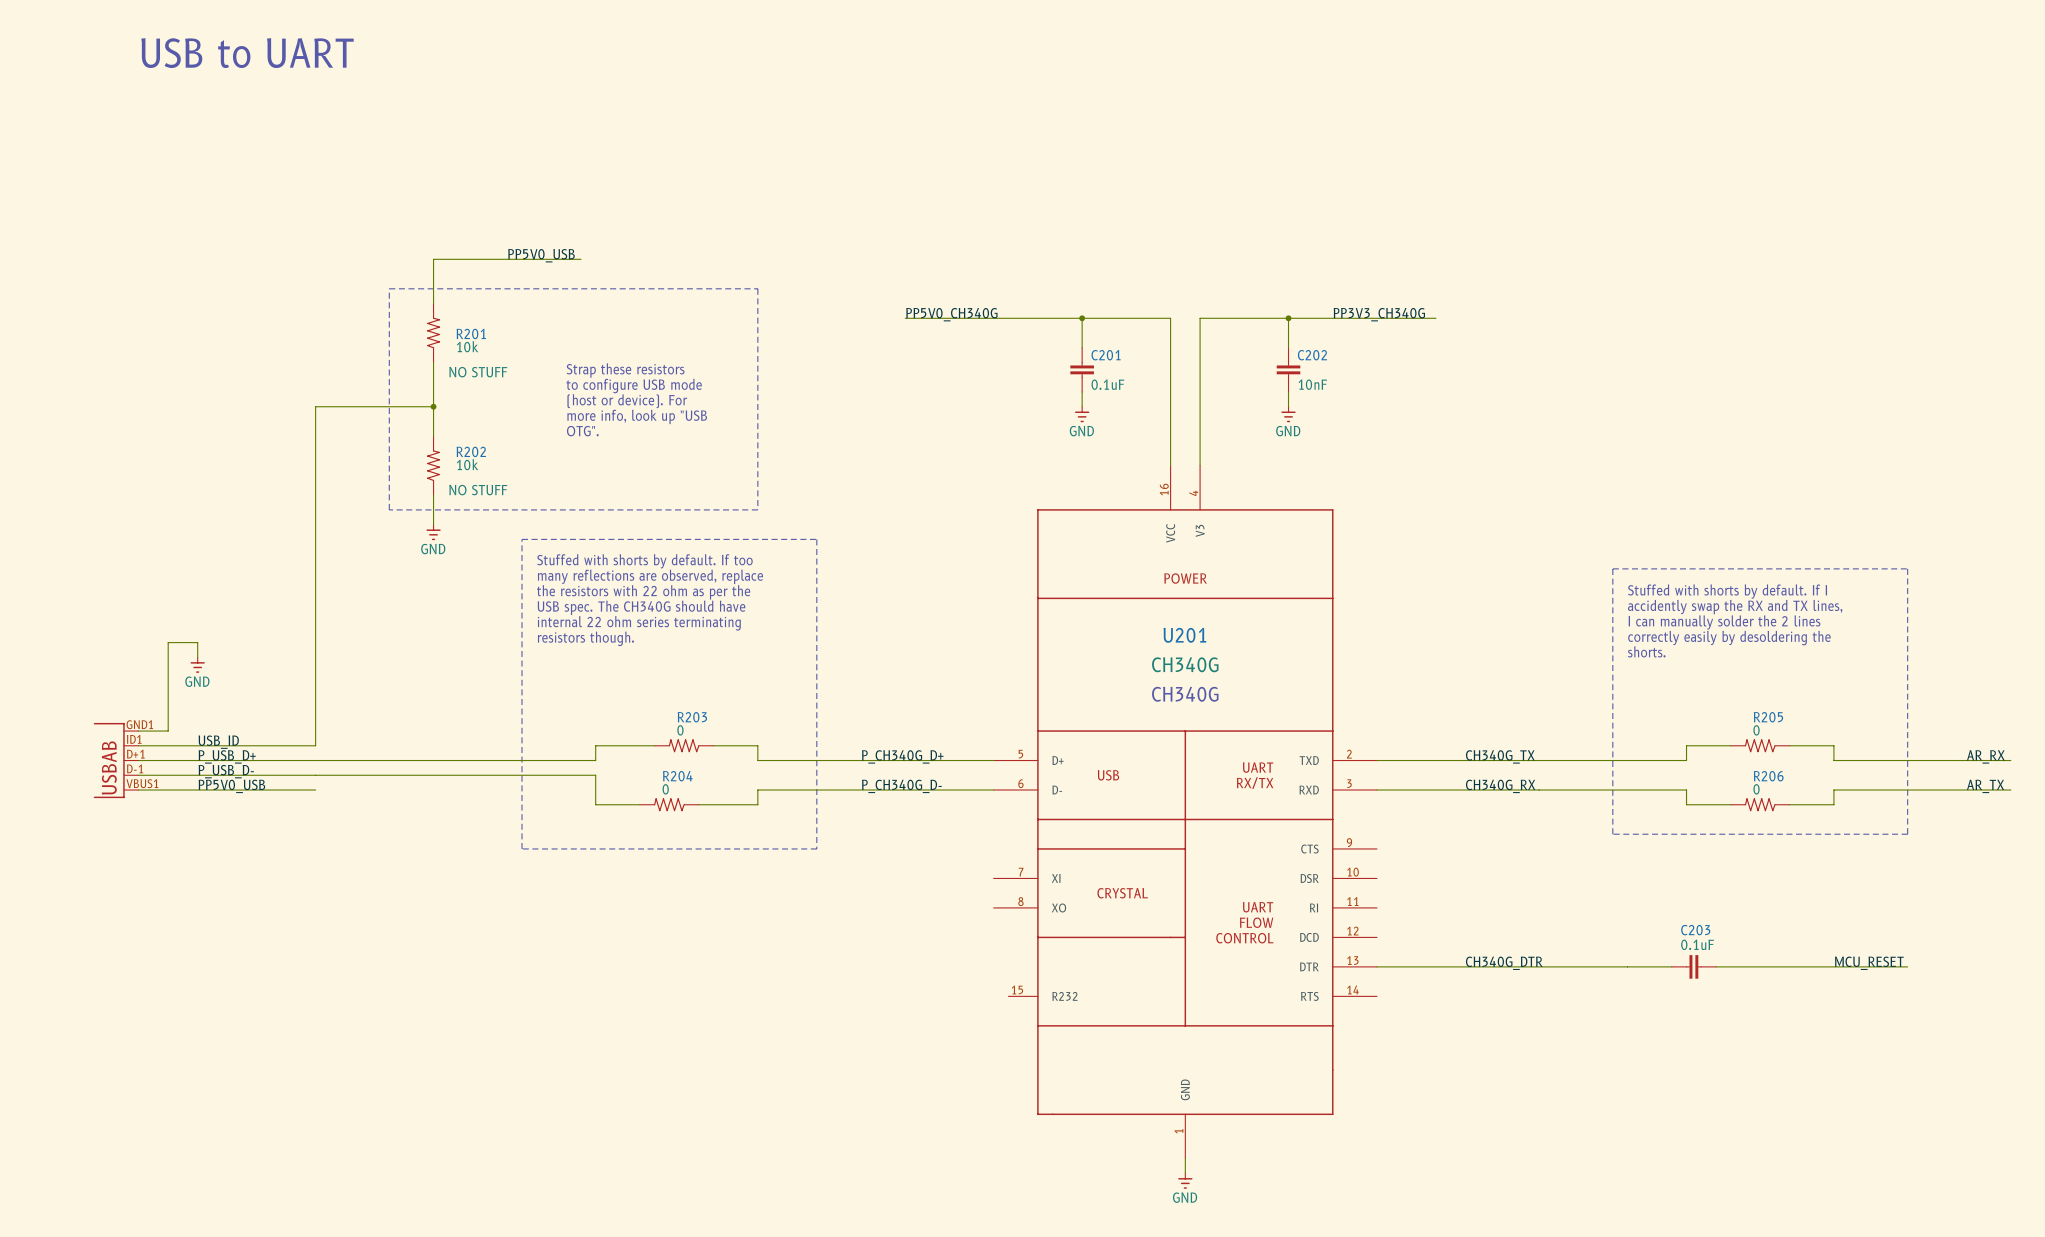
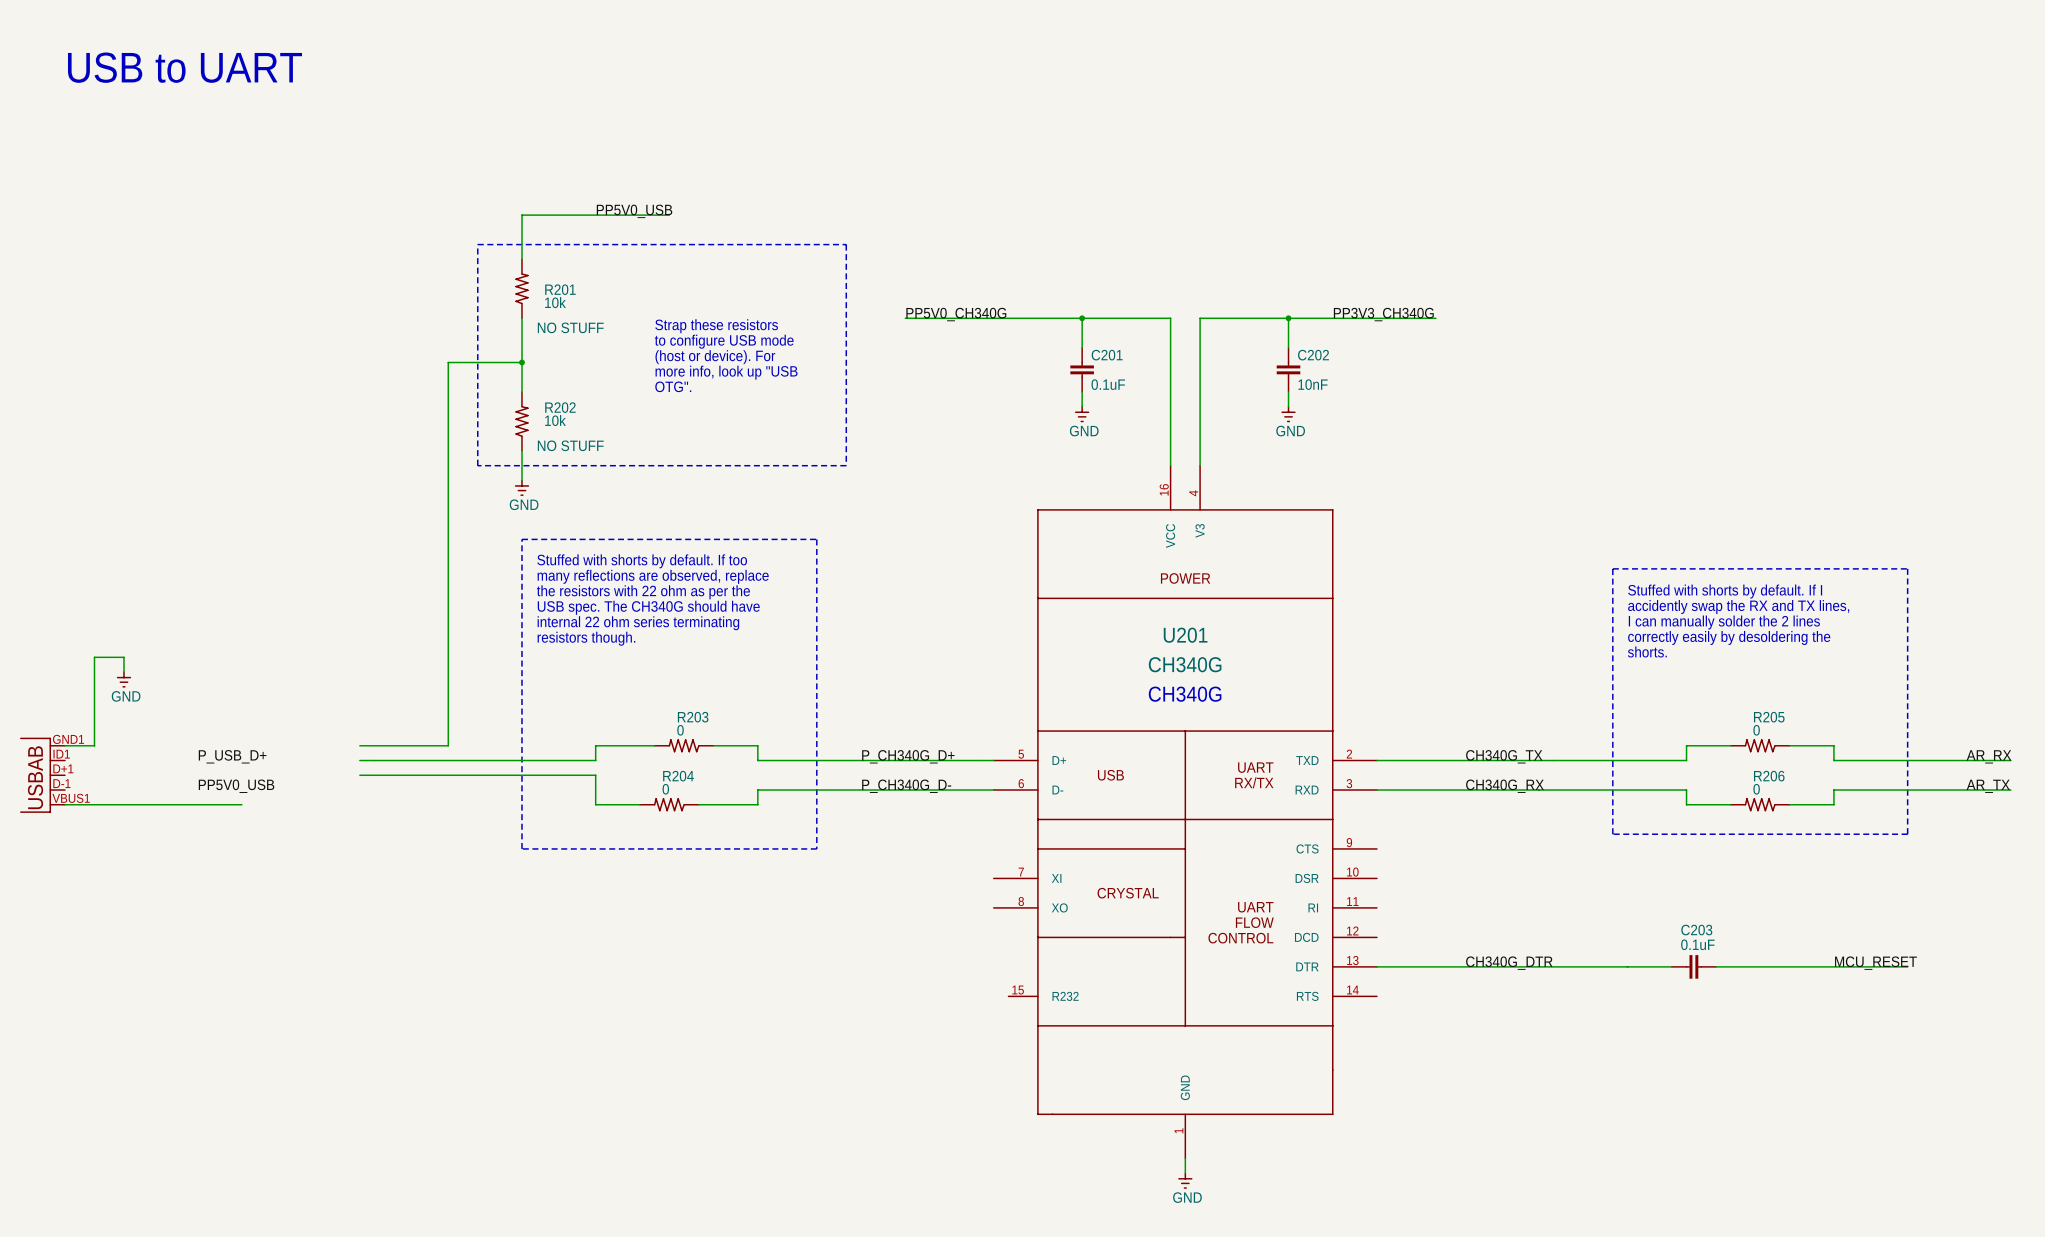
text position: USB to UART (247, 53) -> USB to UART (185, 67)
label position: PP5V0_USB (541, 255) -> PP5V0_USB (634, 211)
wire: (580, 259) (433, 259) (433, 303) -> (669, 215) (521, 215) (521, 259)
line: (389, 288) (757, 288) (757, 509) (389, 509) (389, 288) -> (477, 244) (846, 244) (846, 465) (477, 465) (477, 244)
R201 position: (433, 333) -> (521, 288)
wire: (433, 362) (433, 436) -> (521, 318) (521, 391)
wire: none -> (521, 362) (448, 362) (448, 745) (359, 745)
junction: none -> (521, 362)
text position: Strap these resistors (625, 370) -> Strap these resistors (716, 326)
text position: to configure USB mode (634, 386) -> to configure USB mode (724, 341)
text position: (host or device). For (627, 401) -> (host or device). For (715, 357)
wire: (433, 406) (315, 406) (315, 745) (138, 745) -> none
junction: (433, 406) -> none
text position: more info, look up "USB (637, 416) -> more info, look up "USB (726, 372)
text position: OTG". (582, 431) -> OTG". (673, 386)
R202 position: (433, 465) -> (521, 421)
wire: (433, 495) (433, 524) -> (521, 450) (521, 480)
power symbol position: GND (433, 532) -> GND (521, 487)
wire: (197, 657) (197, 642) (168, 642) (168, 731) (138, 731) -> (123, 672) (123, 657) (94, 657) (94, 745) (65, 745)
power symbol position: GND (197, 664) -> GND (123, 679)
label: USB_ID (218, 742) -> none
part position: (116, 760) -> (42, 775)
wire: (138, 760) (359, 760) -> none
label: P_USB_D- (226, 771) -> none
wire: (138, 775) (359, 775) -> none
wire: (138, 790) (315, 790) -> (65, 804) (241, 804)

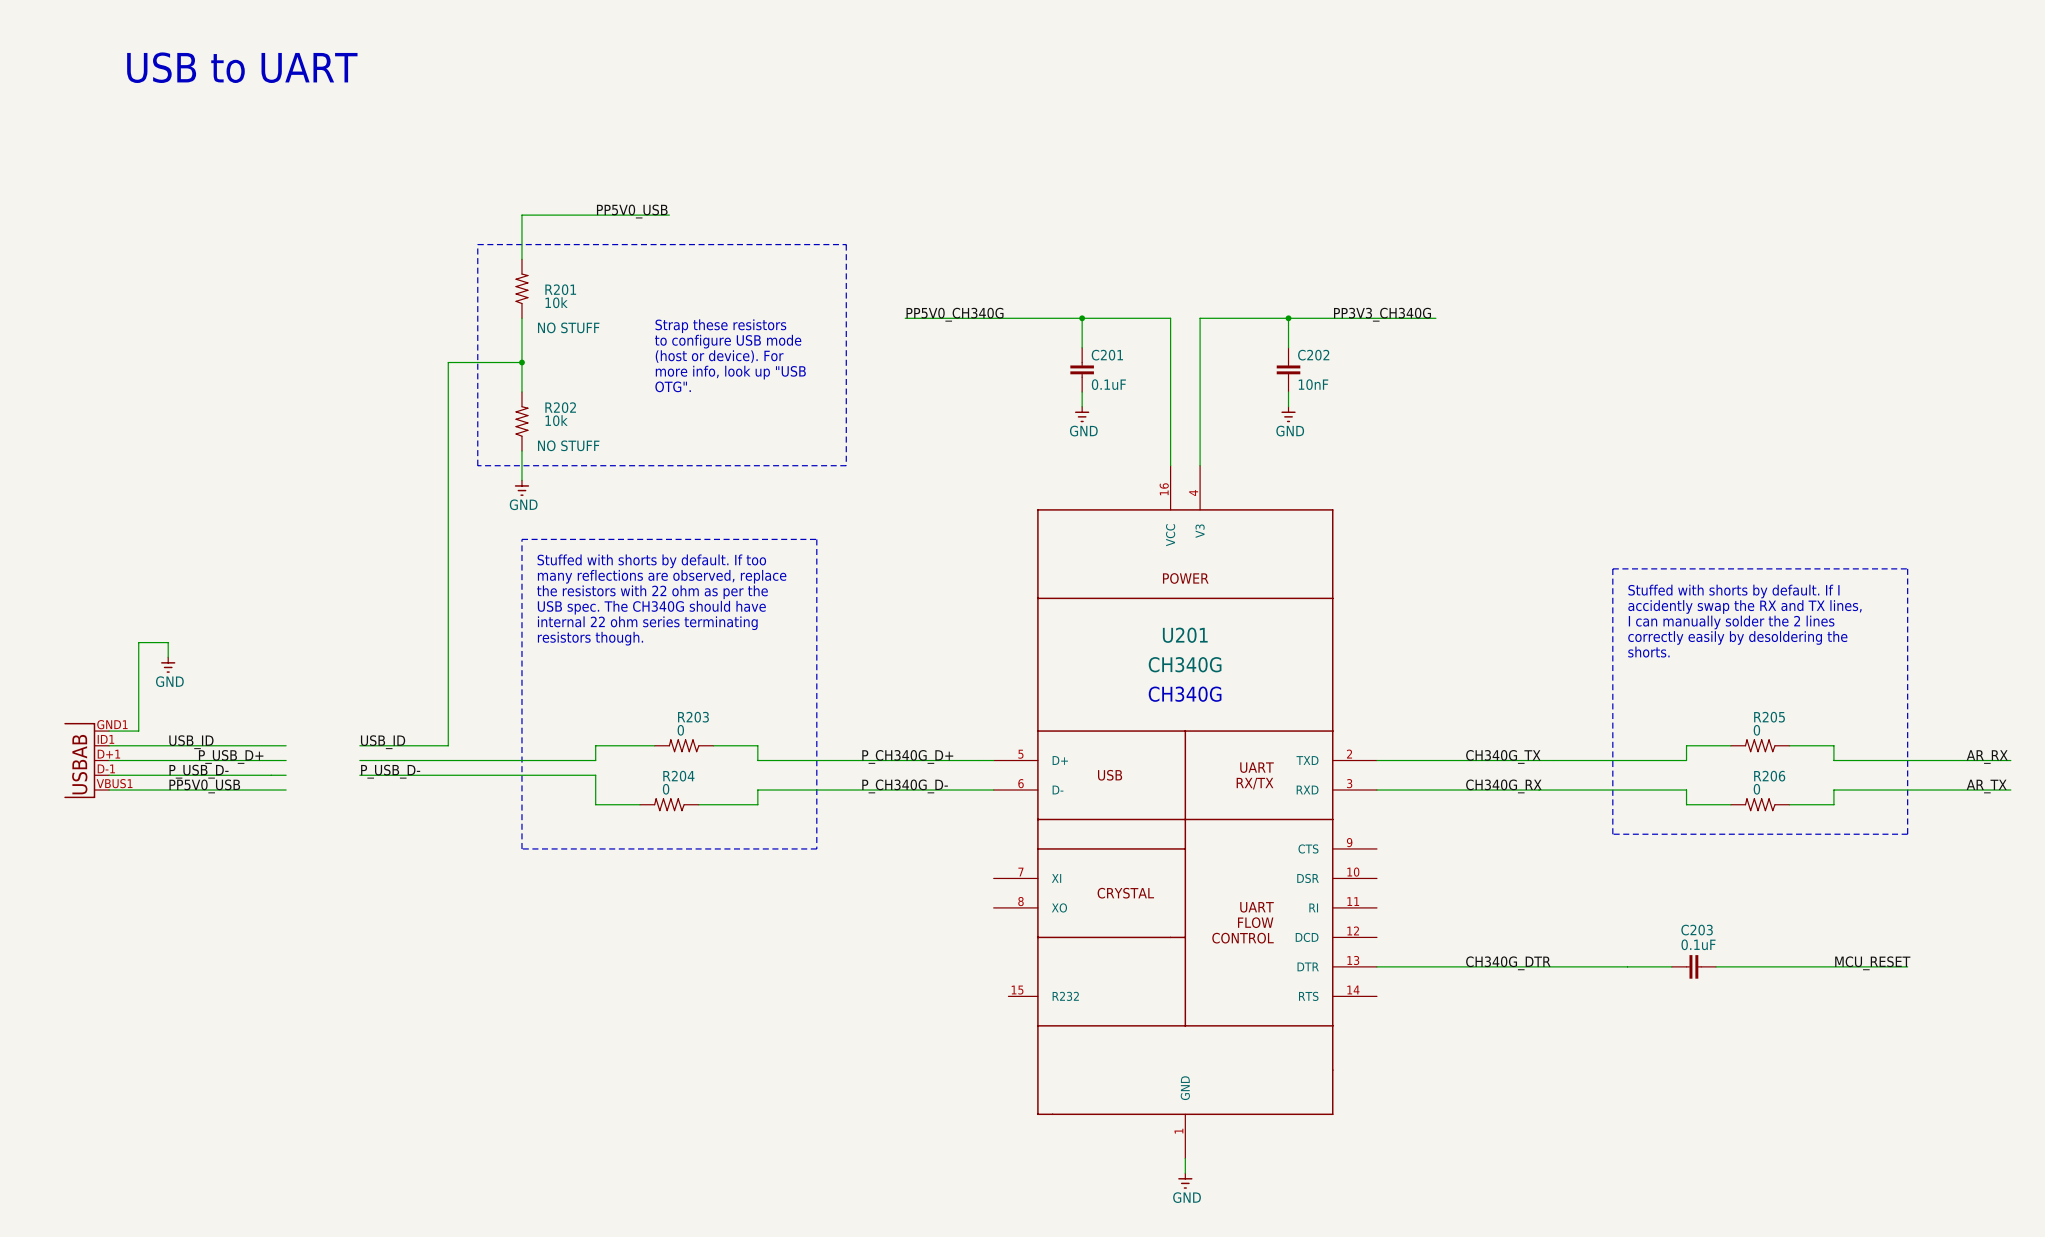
text position: USB to UART (185, 67) -> USB to UART (242, 67)
wire: (123, 672) (123, 657) (94, 657) (94, 745) (65, 745) -> (168, 657) (168, 642) (138, 642) (138, 731) (109, 731)
power symbol position: GND (123, 679) -> GND (168, 664)
label: none -> USB_ID (191, 742)
label: none -> USB_ID (383, 742)
wire: none -> (109, 745) (286, 745)
wire: none -> (109, 760) (286, 760)
label: none -> P_USB_D- (199, 771)
label: none -> P_USB_D- (390, 771)
part position: (42, 775) -> (86, 760)
wire: none -> (109, 775) (286, 775)
label position: PP5V0_USB (236, 786) -> PP5V0_USB (204, 786)
wire: (65, 804) (241, 804) -> (109, 790) (286, 790)

